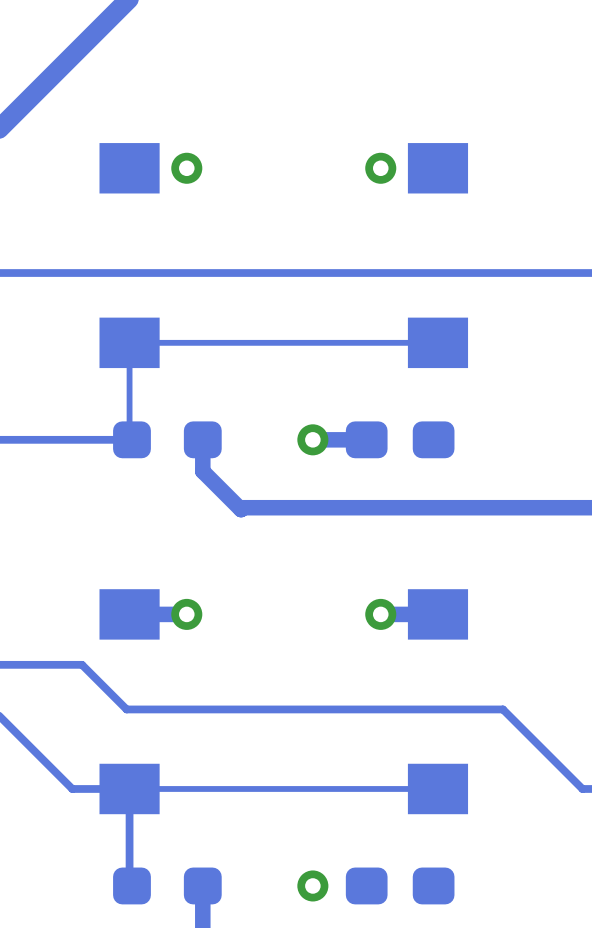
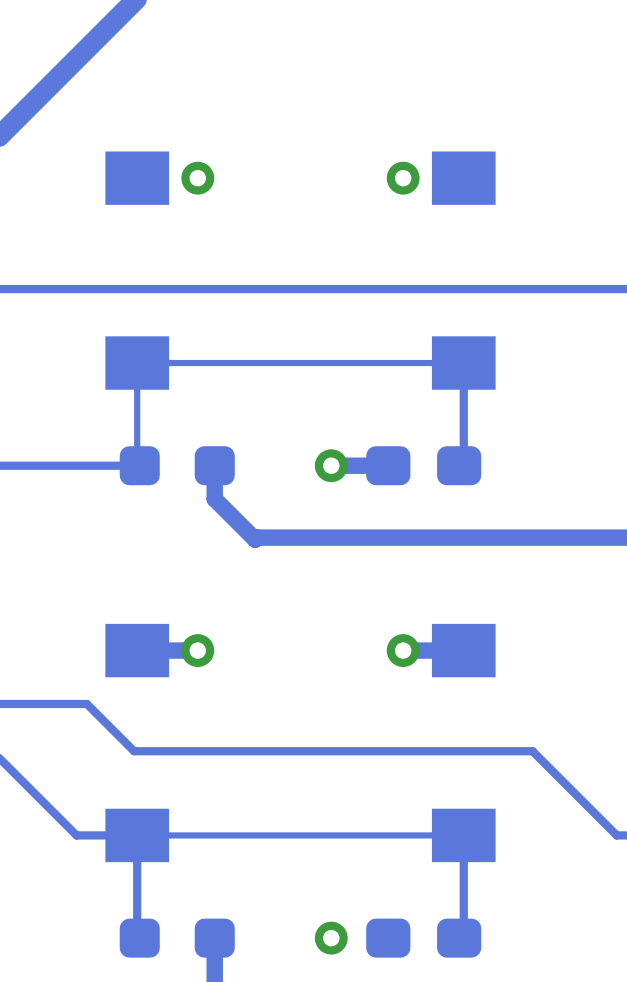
bottom track: none -> (463, 363) (463, 461) (459, 465)
bottom track: none -> (463, 835) (463, 933) (459, 938)

